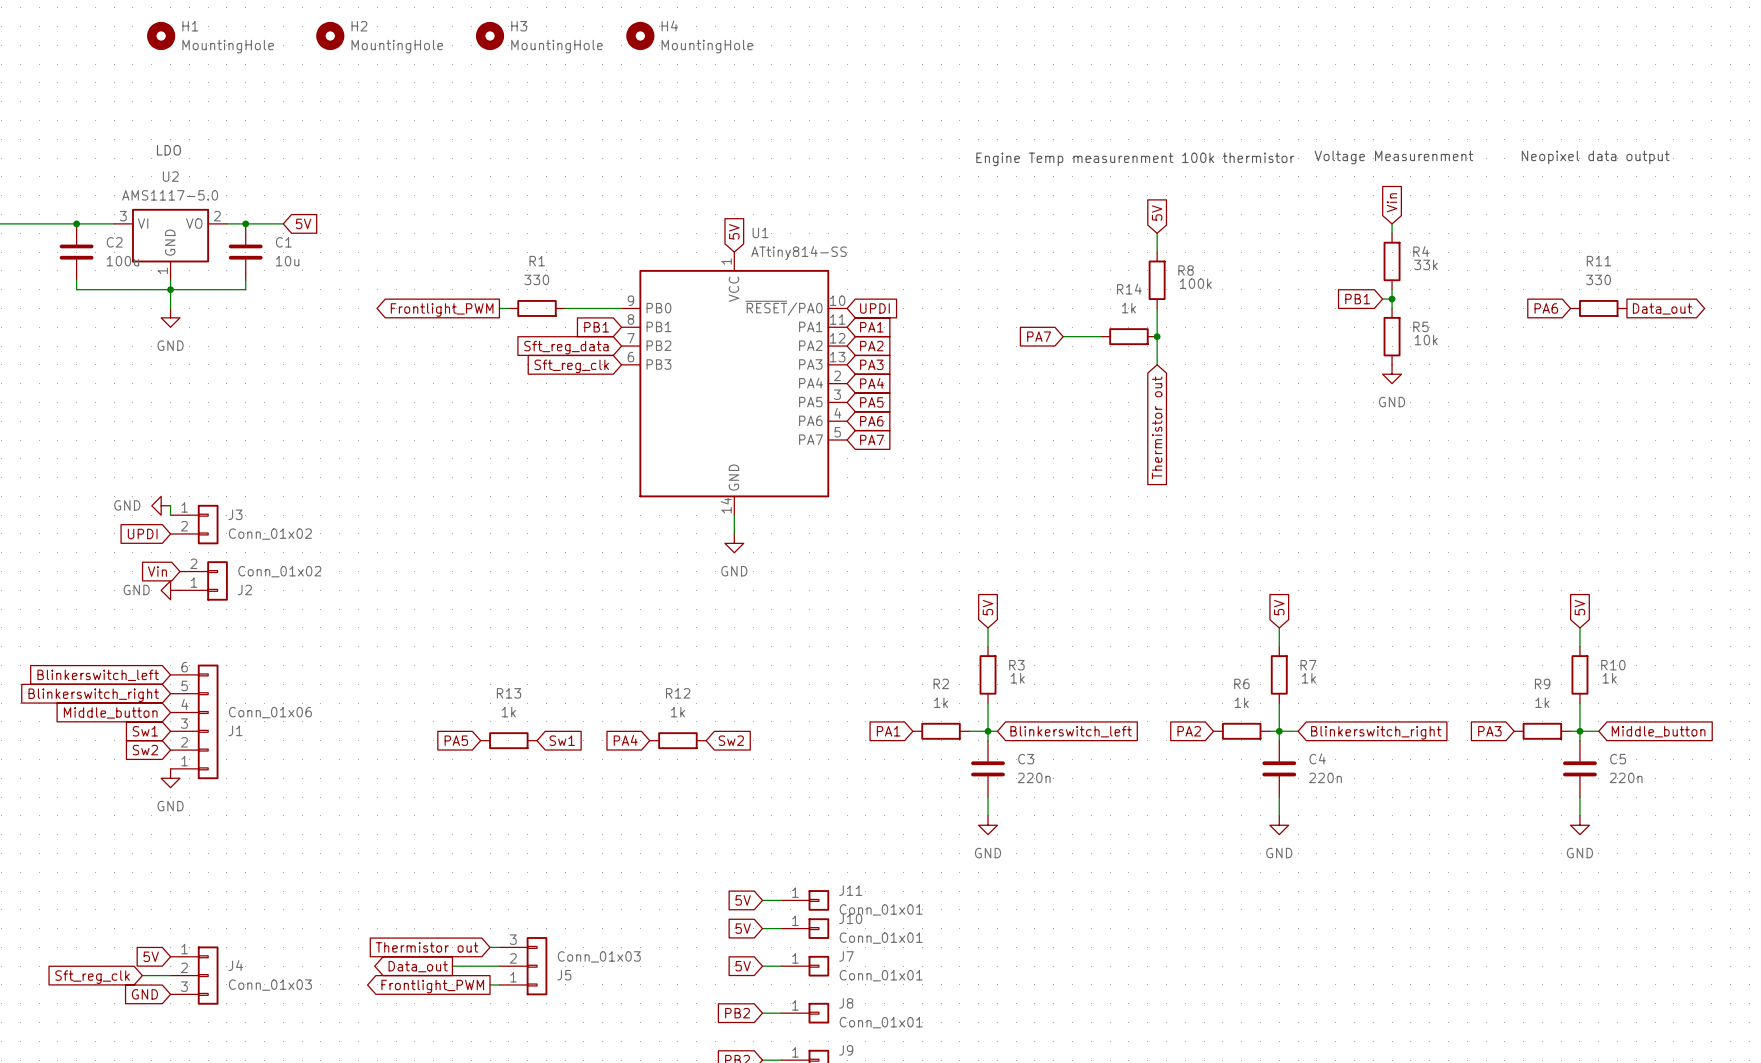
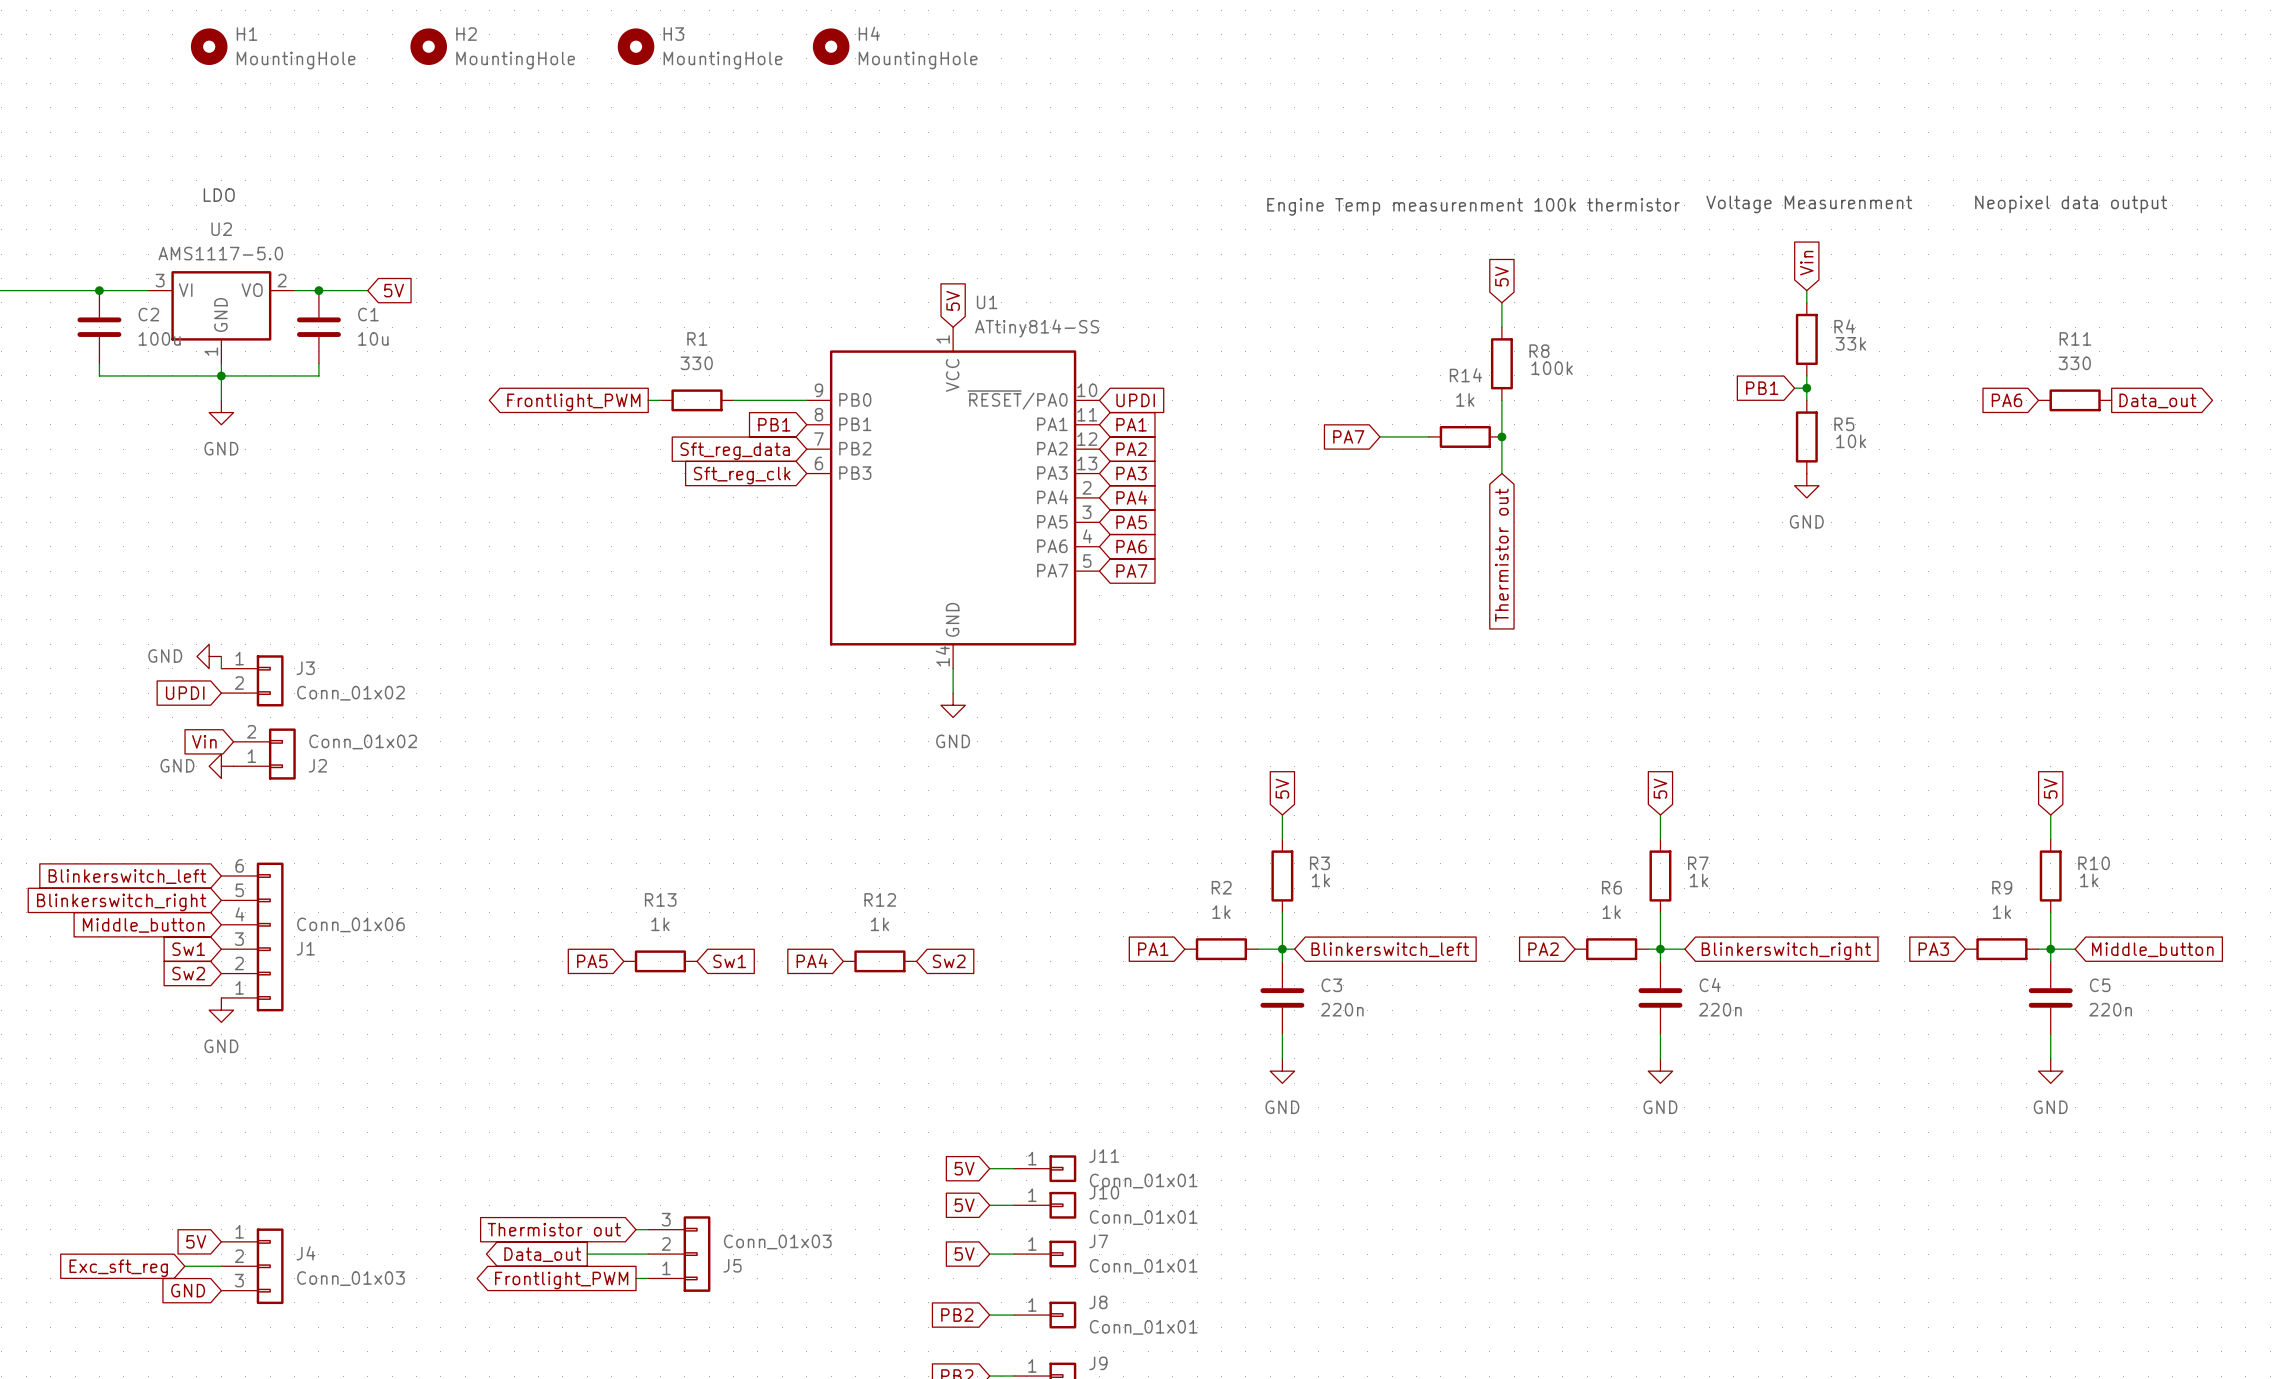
global label: Sft_reg_clk (92, 977) -> Exc_sft_reg (118, 1268)

